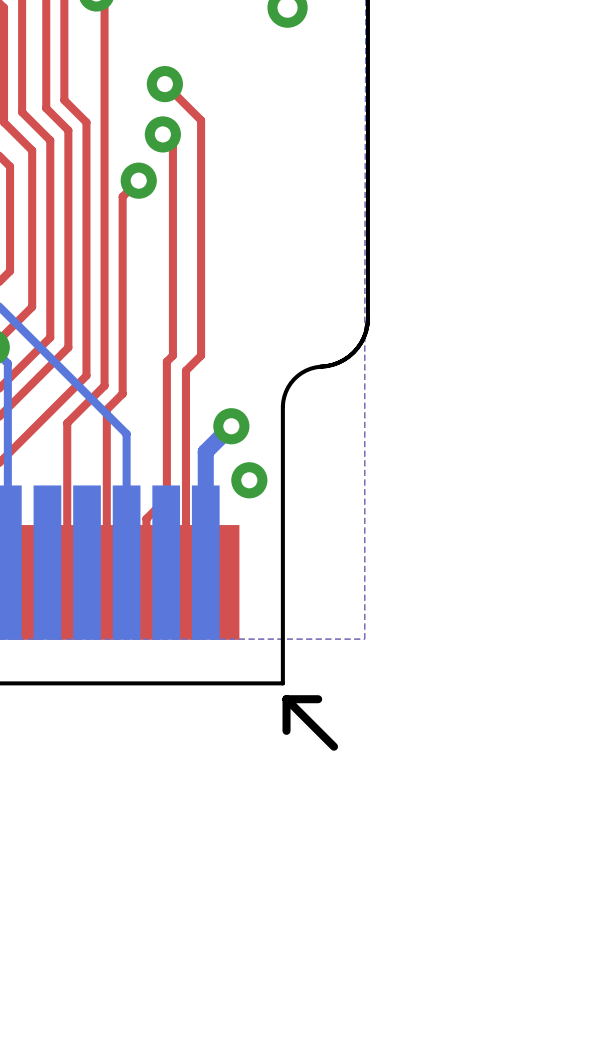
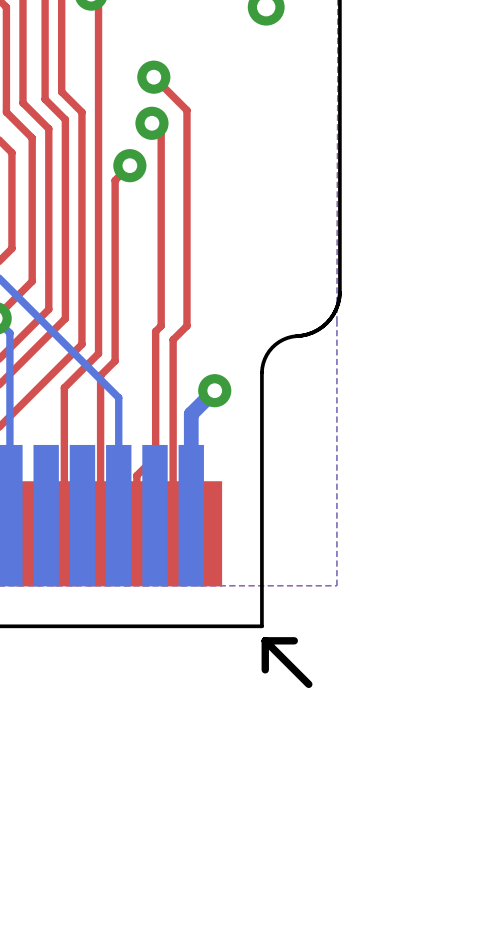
via: (249, 480) -> none

